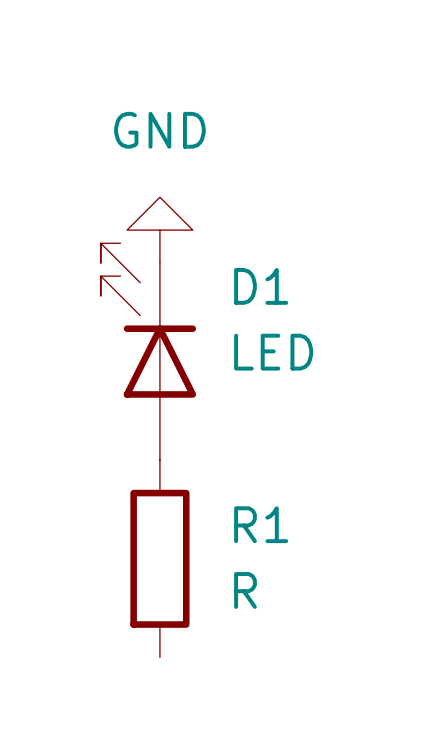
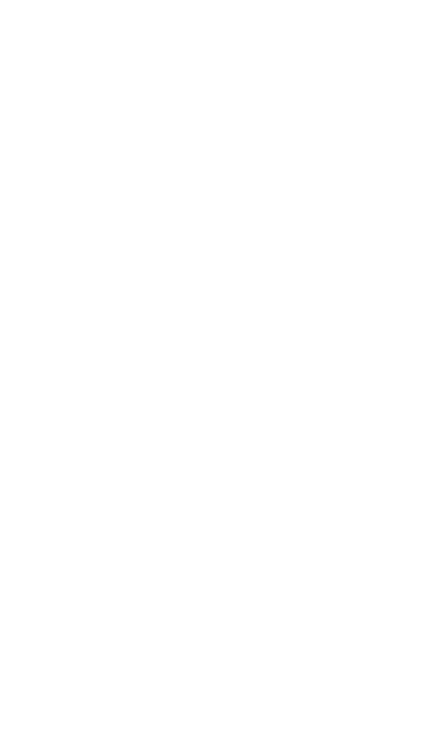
power symbol: GND (159, 230) -> none
D1: LED (148, 351) -> none
R1: R (159, 558) -> none

